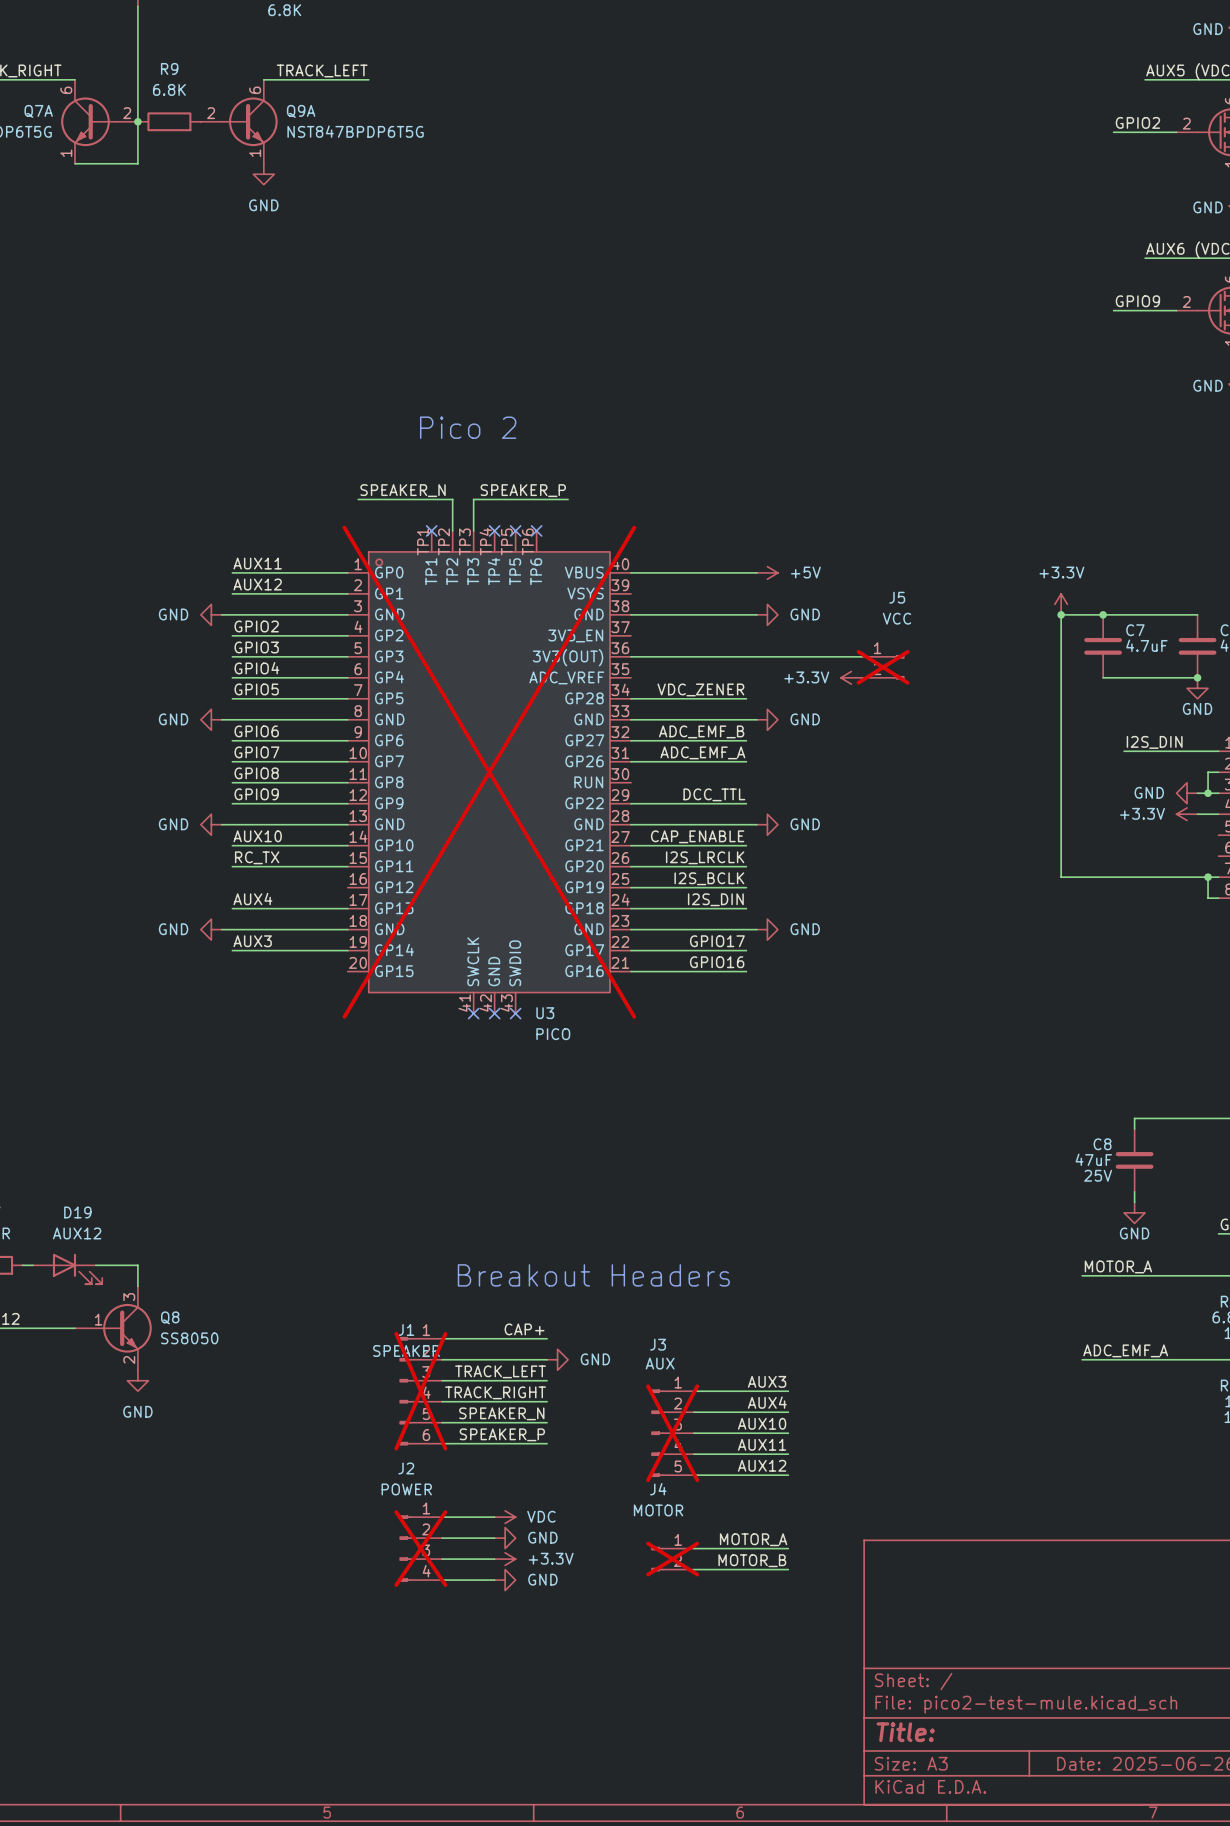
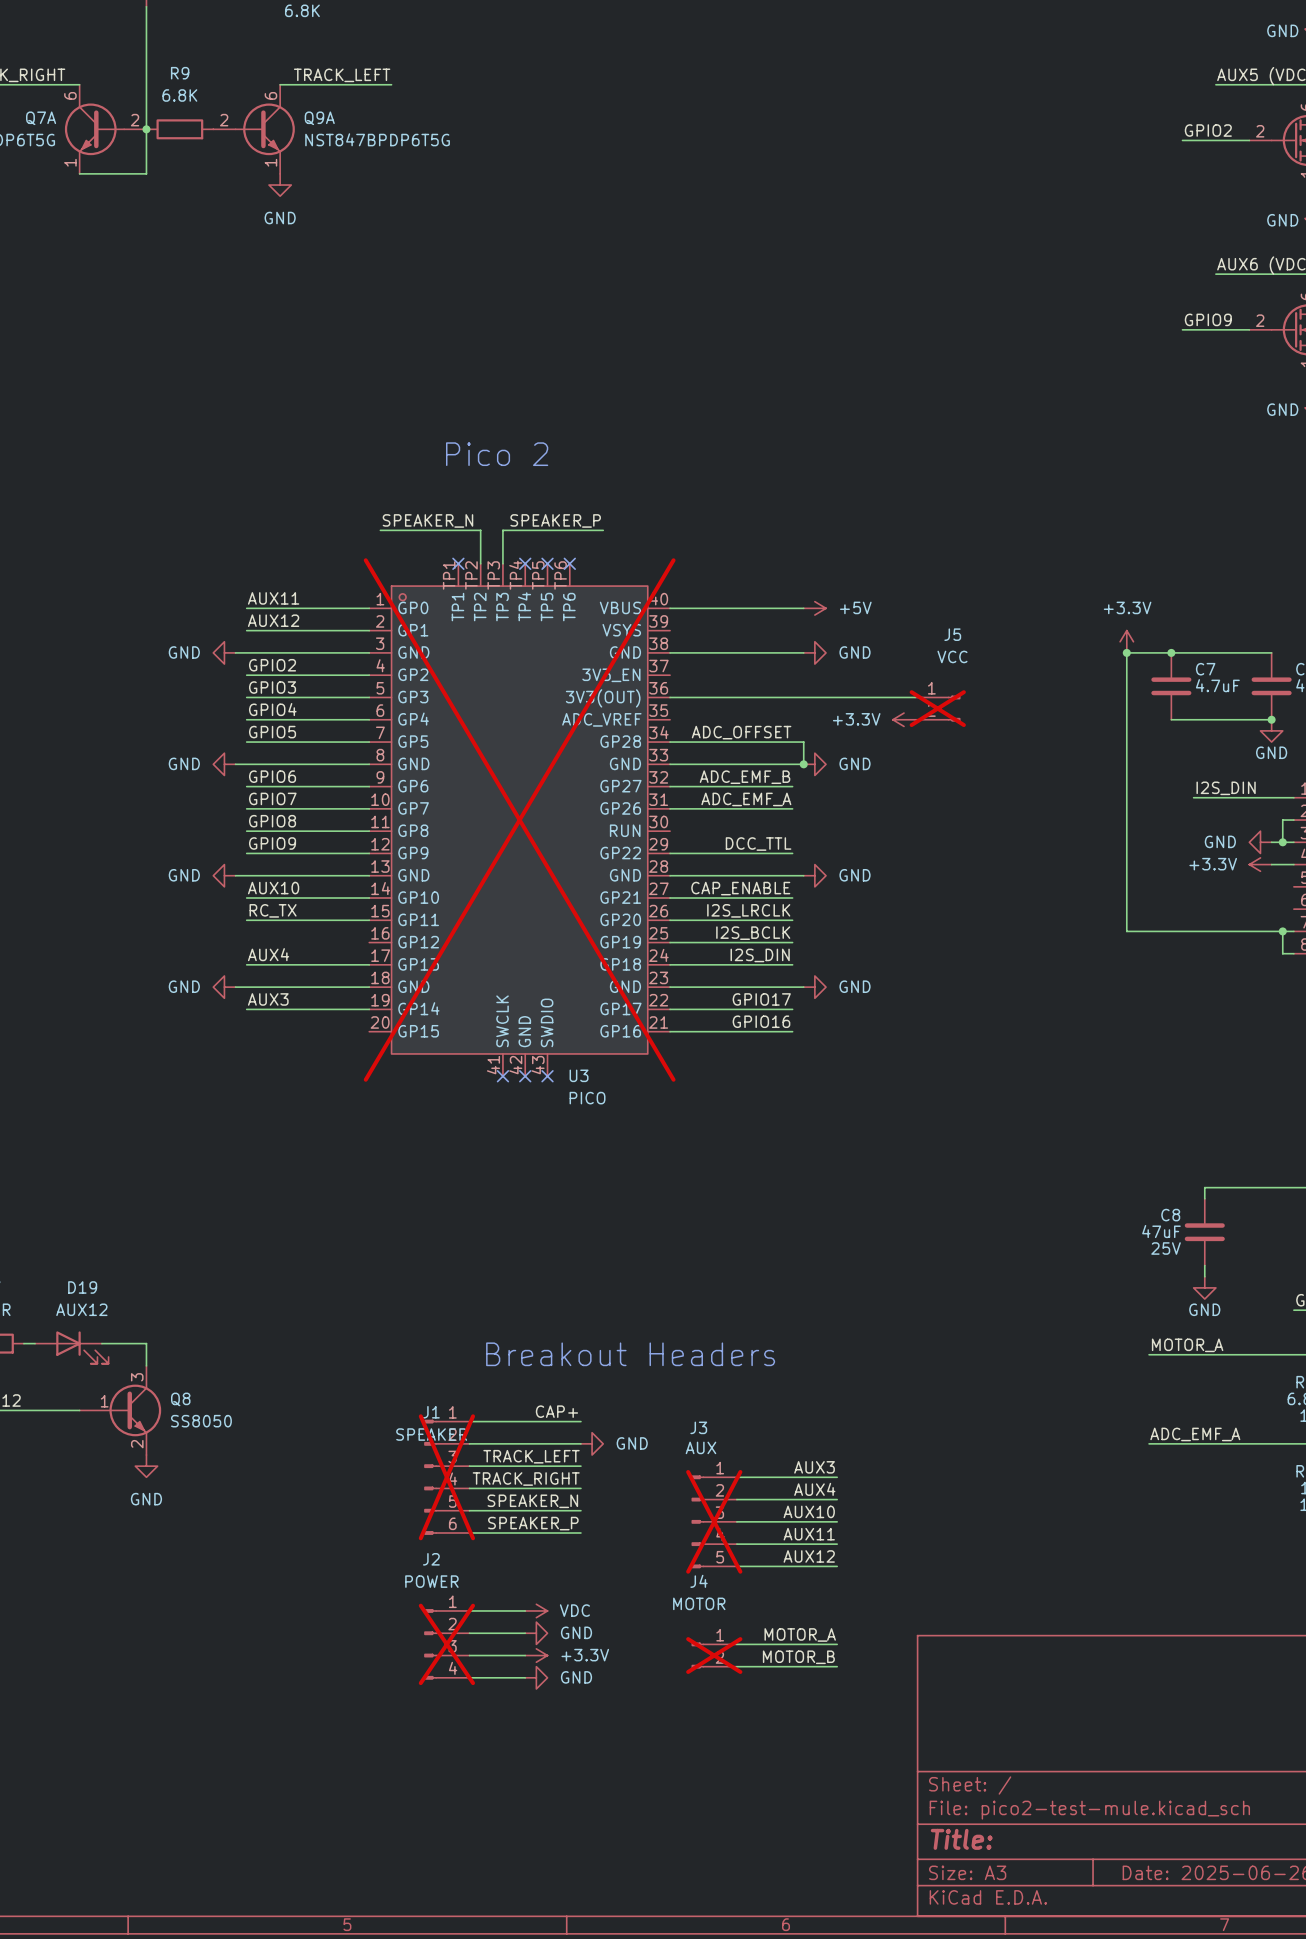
label: VDC_ZENER (700, 689) -> ADC_OFFSET (741, 732)
wire: none -> (792, 742) (803, 742) (803, 764)
junction: none -> (803, 764)

